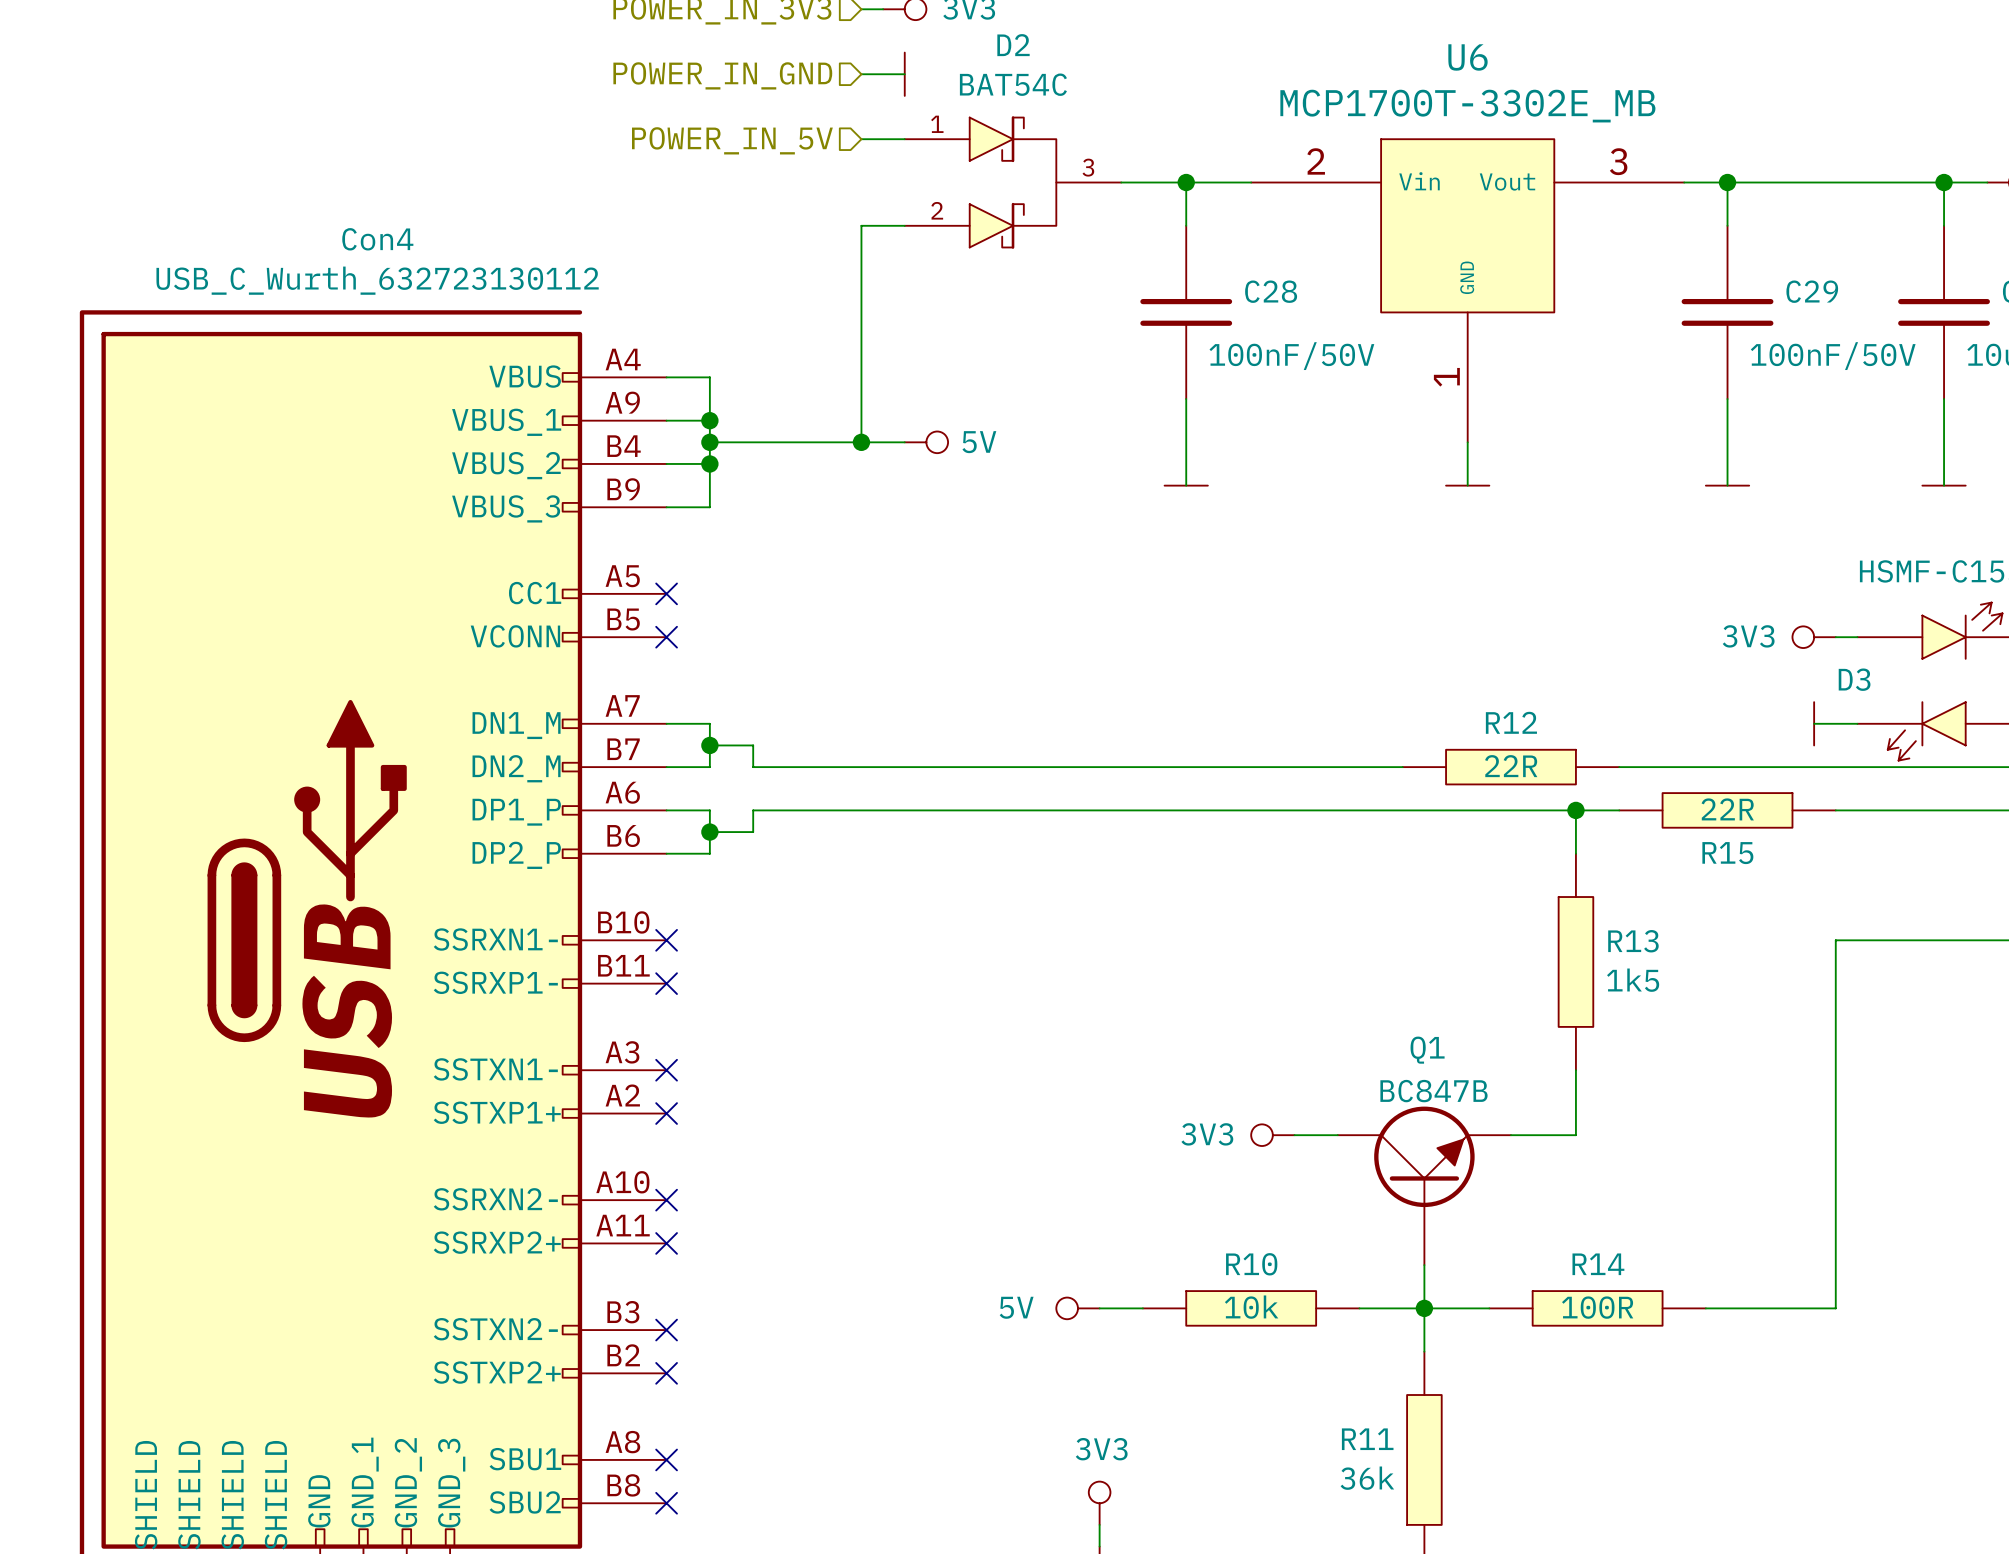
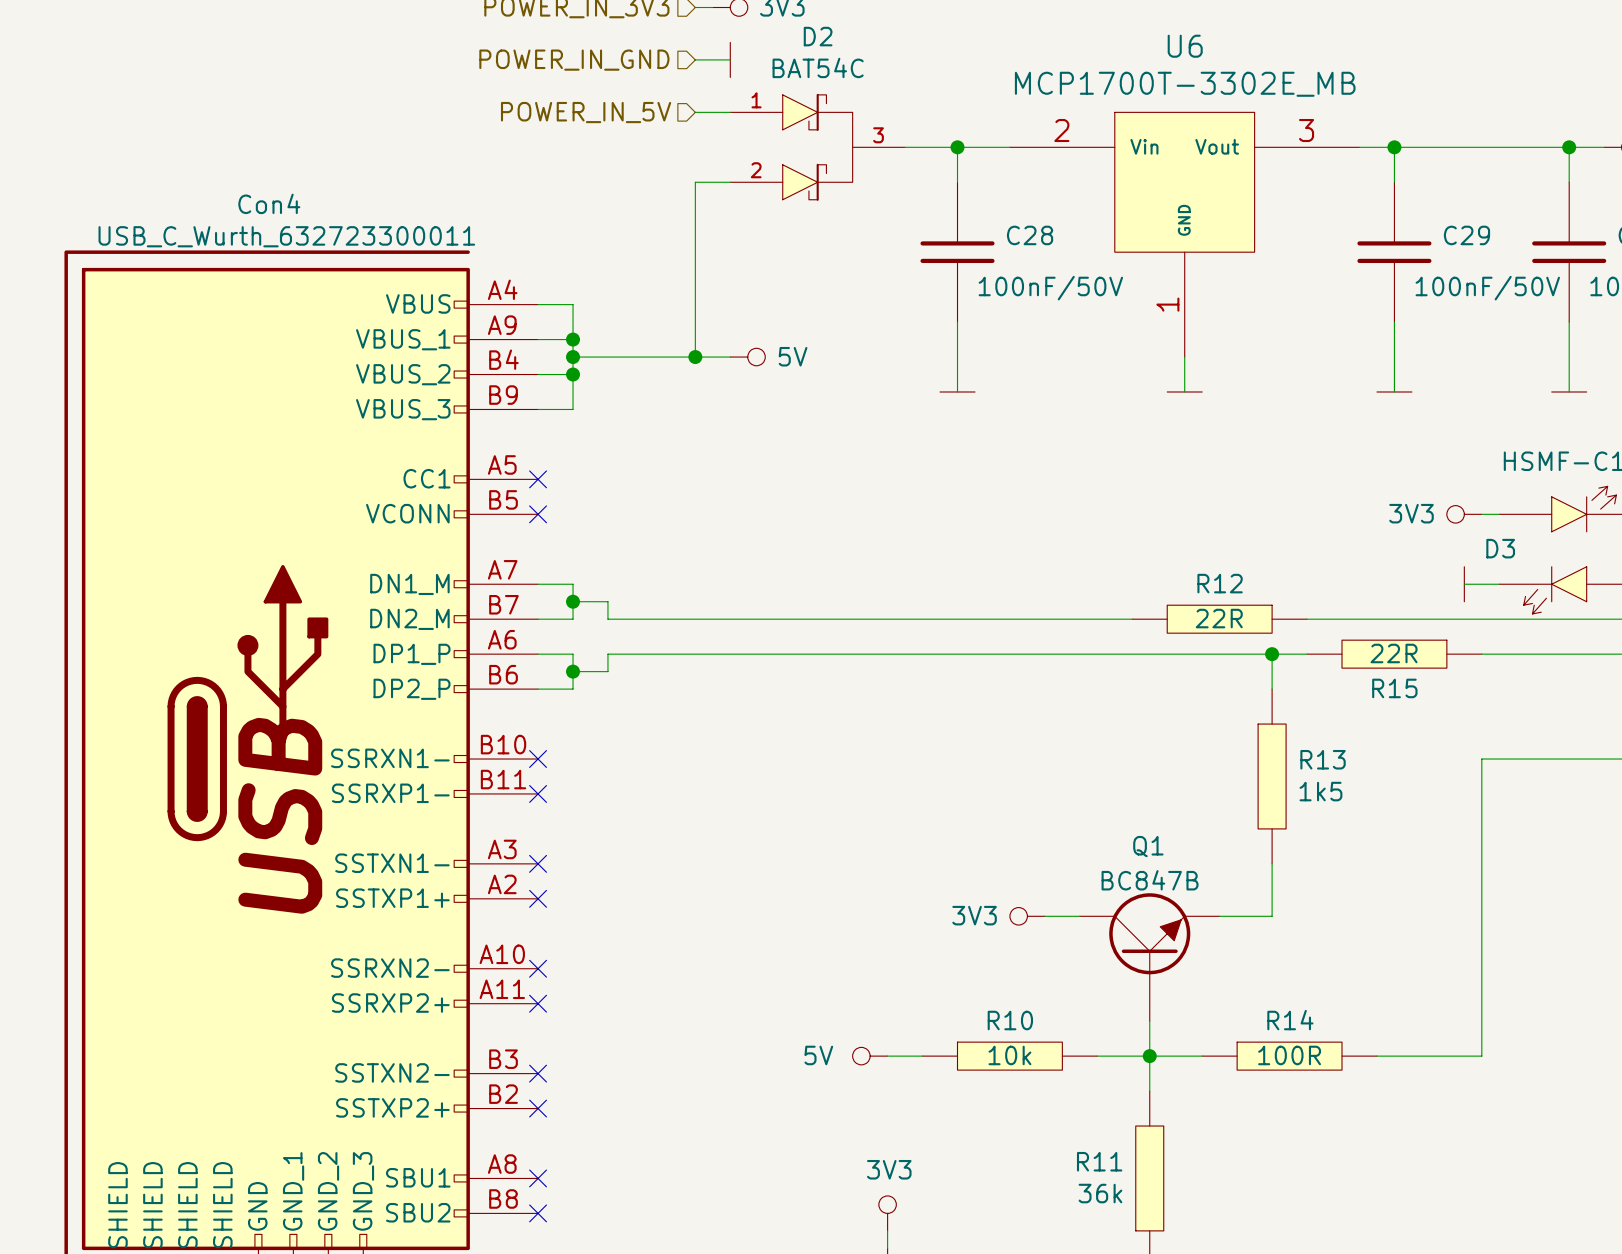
Con4 name position: Con4 (377, 239) -> Con4 (269, 203)
Con4 value: USB_C_Wurth_632723130112 (377, 280) -> USB_C_Wurth_632723300011 (286, 236)

